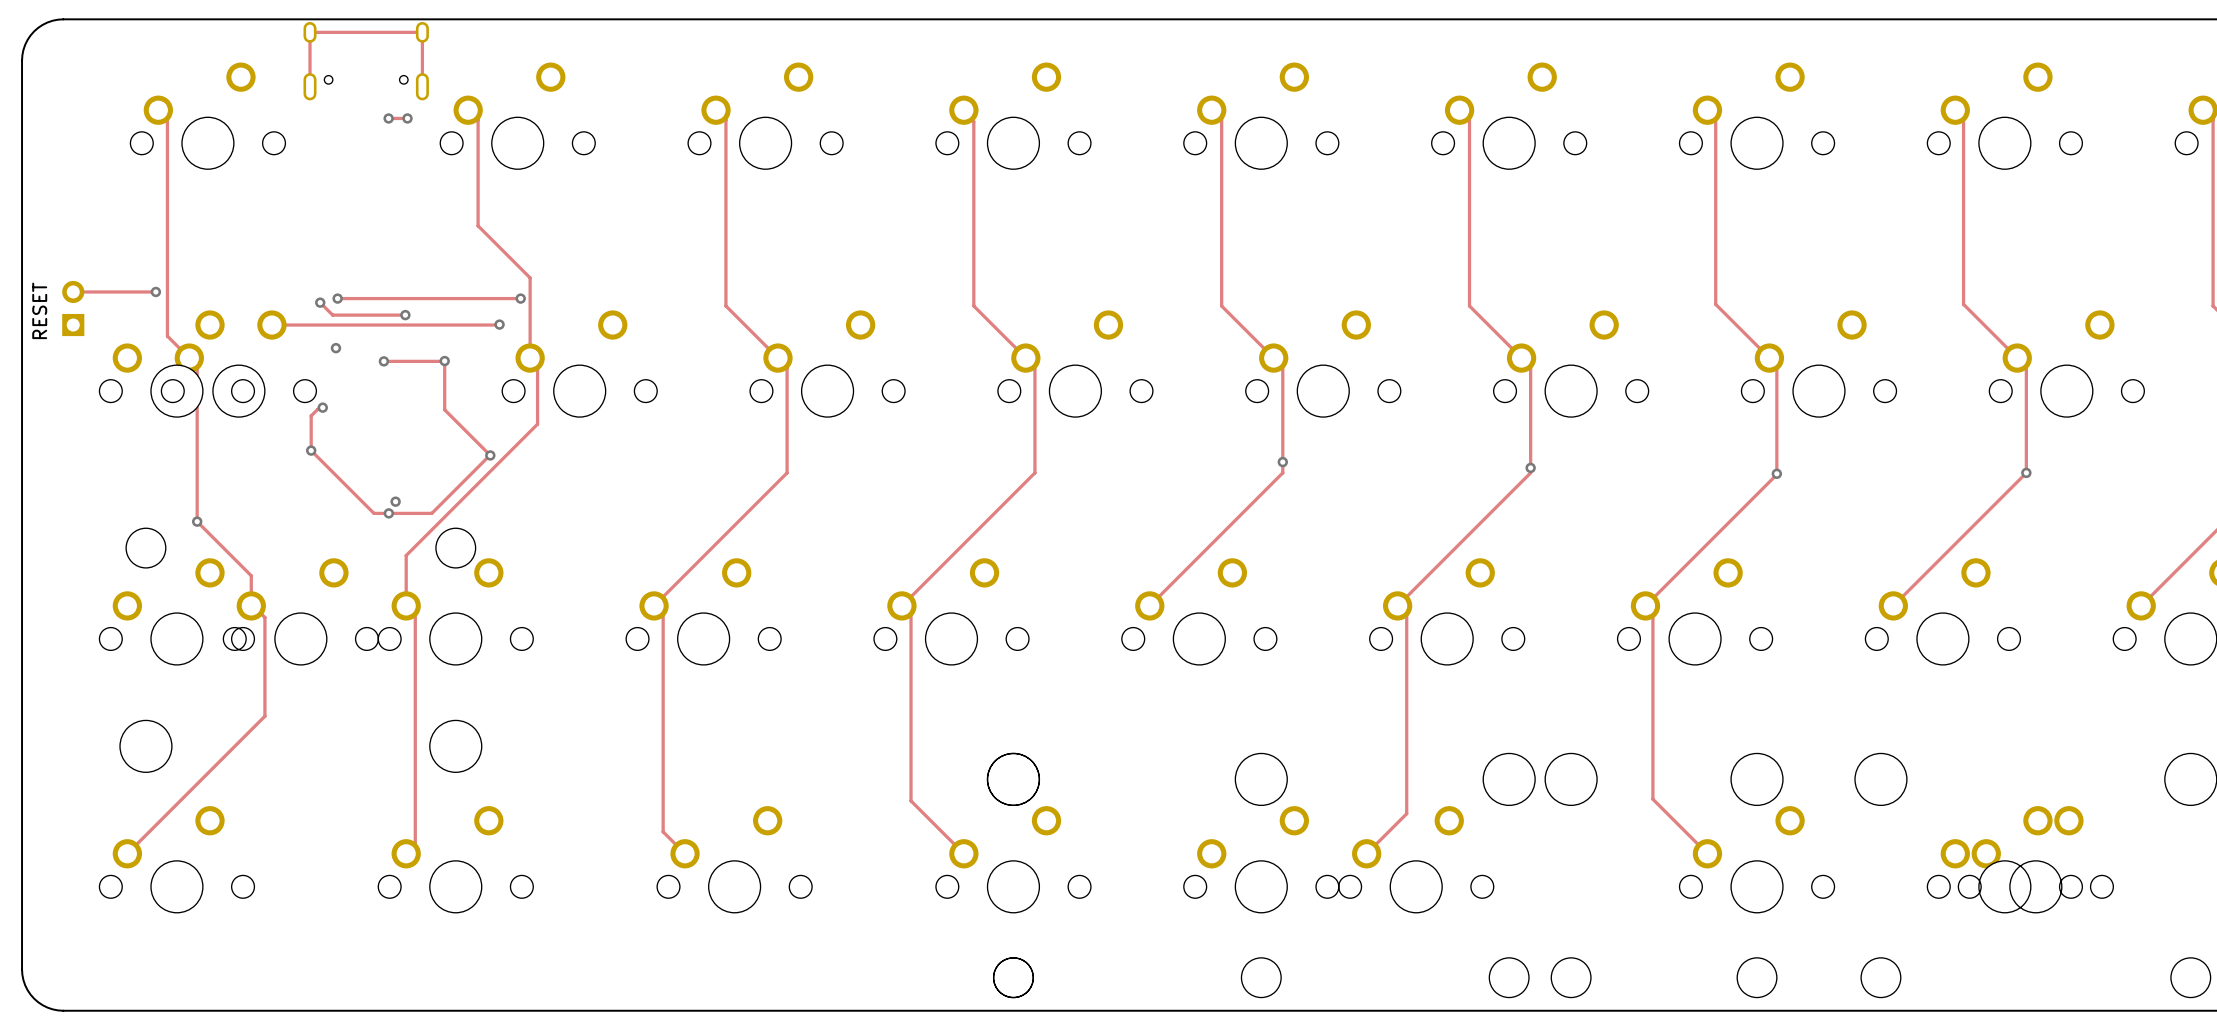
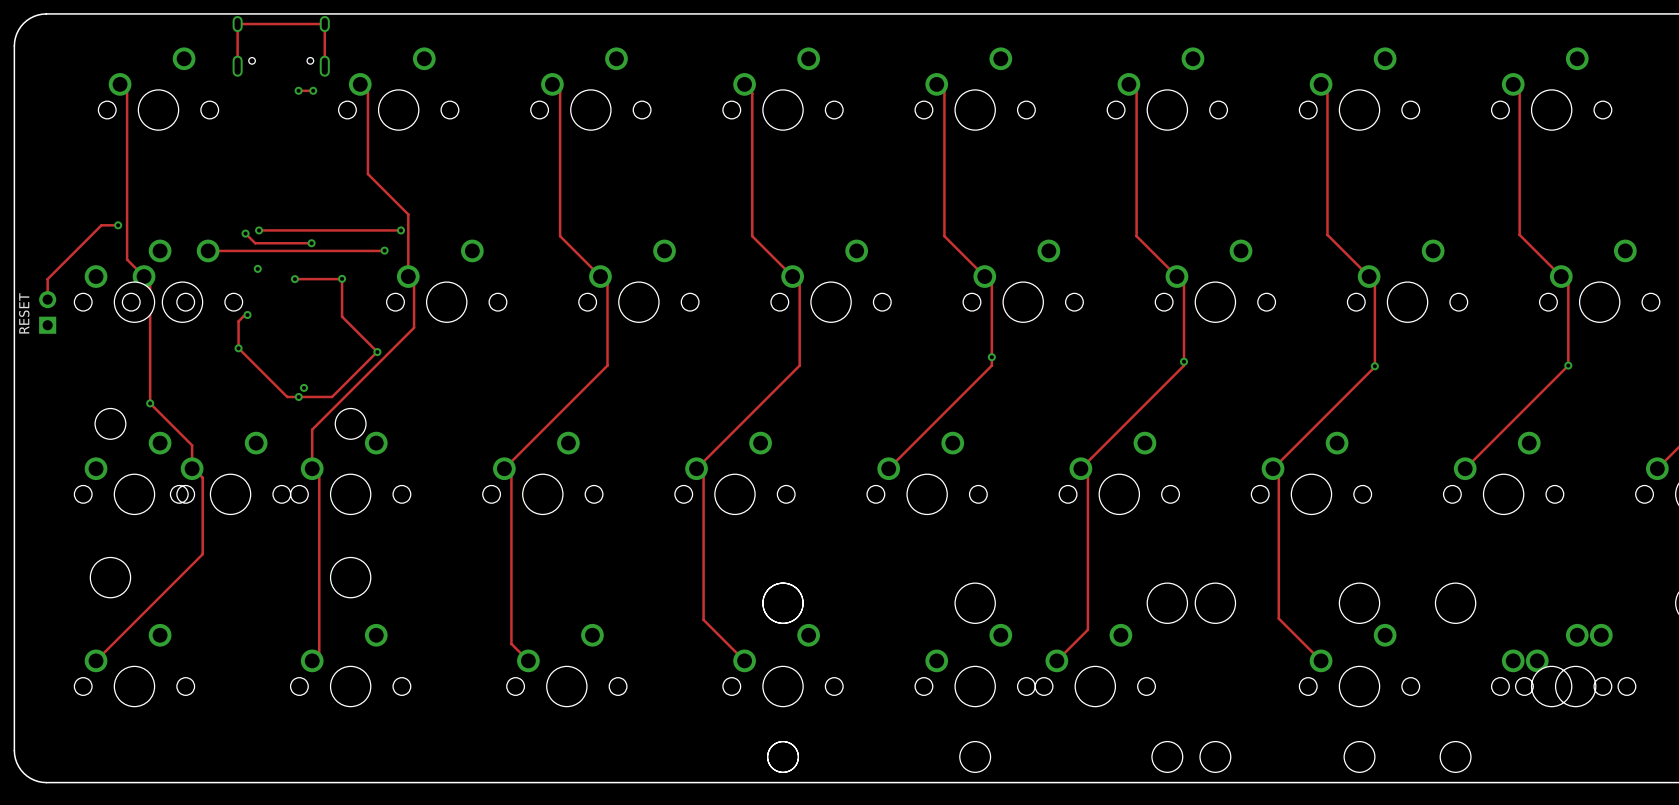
track: (73, 291) (134, 291) -> (47, 299) (47, 279) (101, 225)
part position: (73, 308) -> (47, 312)
text position: RESET (39, 310) -> RESET (24, 313)

